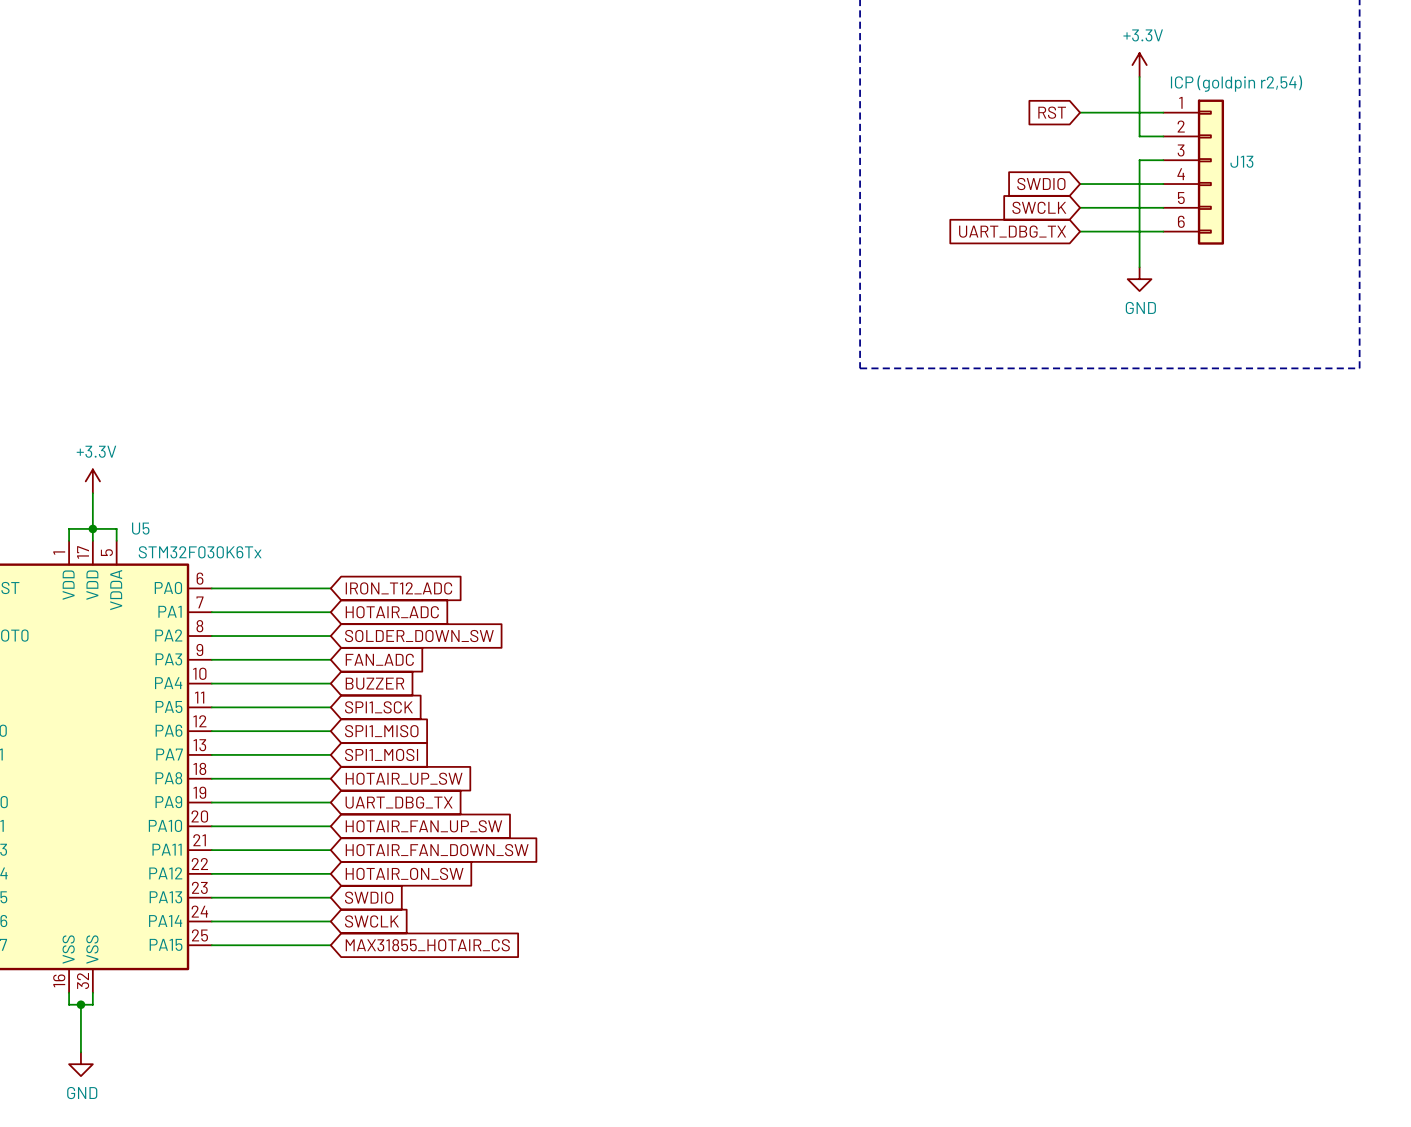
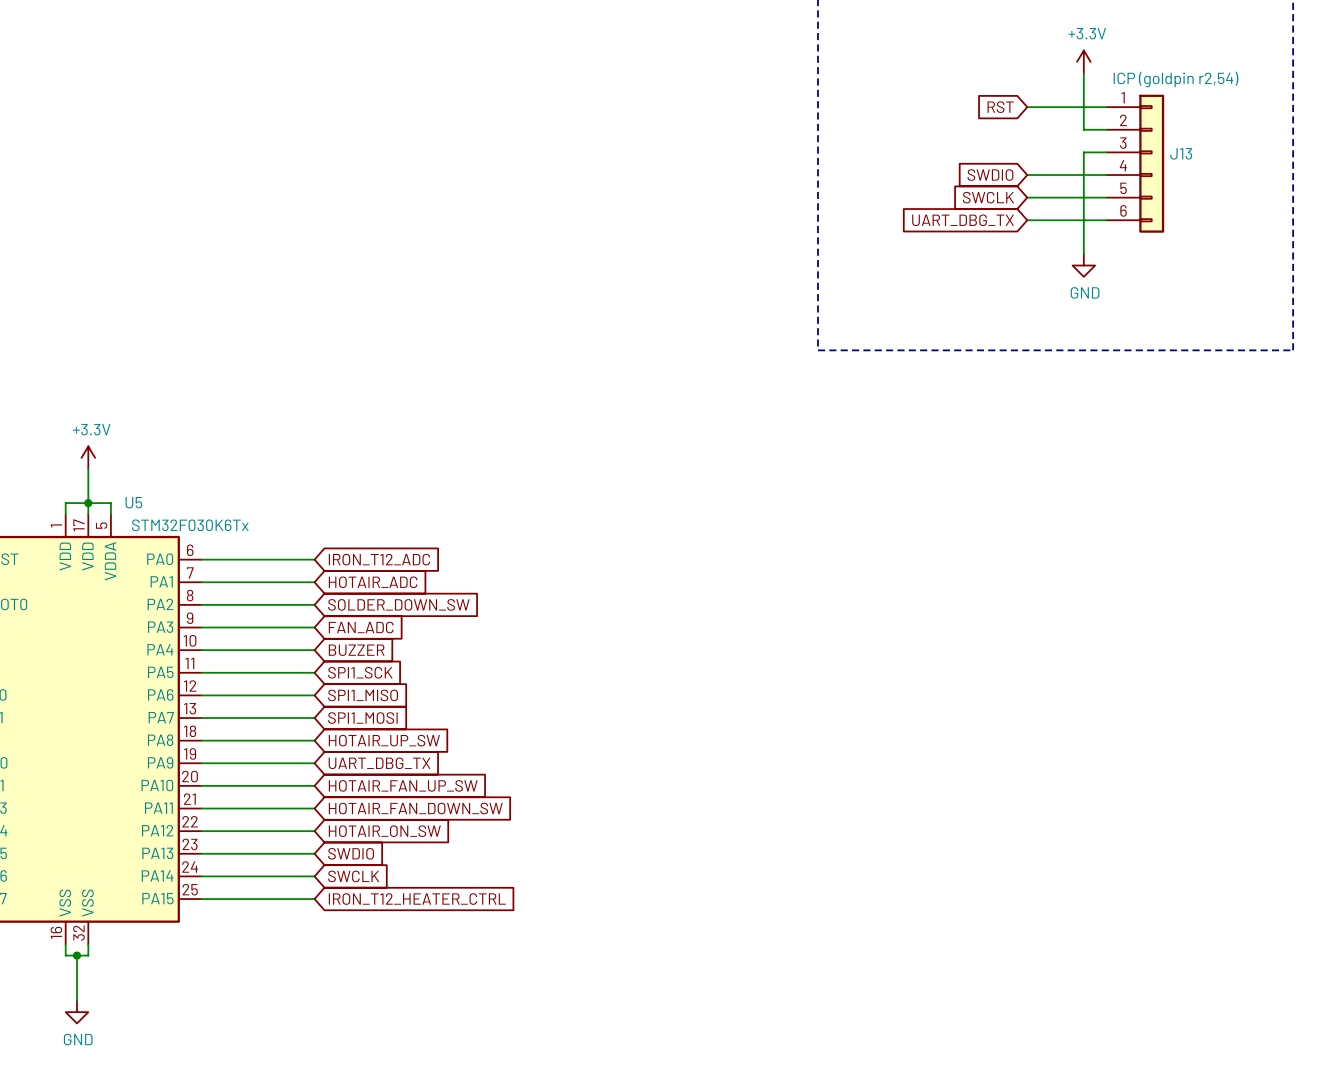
global label: MAX31855_HOTAIR_CS (427, 945) -> IRON_T12_HEATER_CTRL (417, 899)

